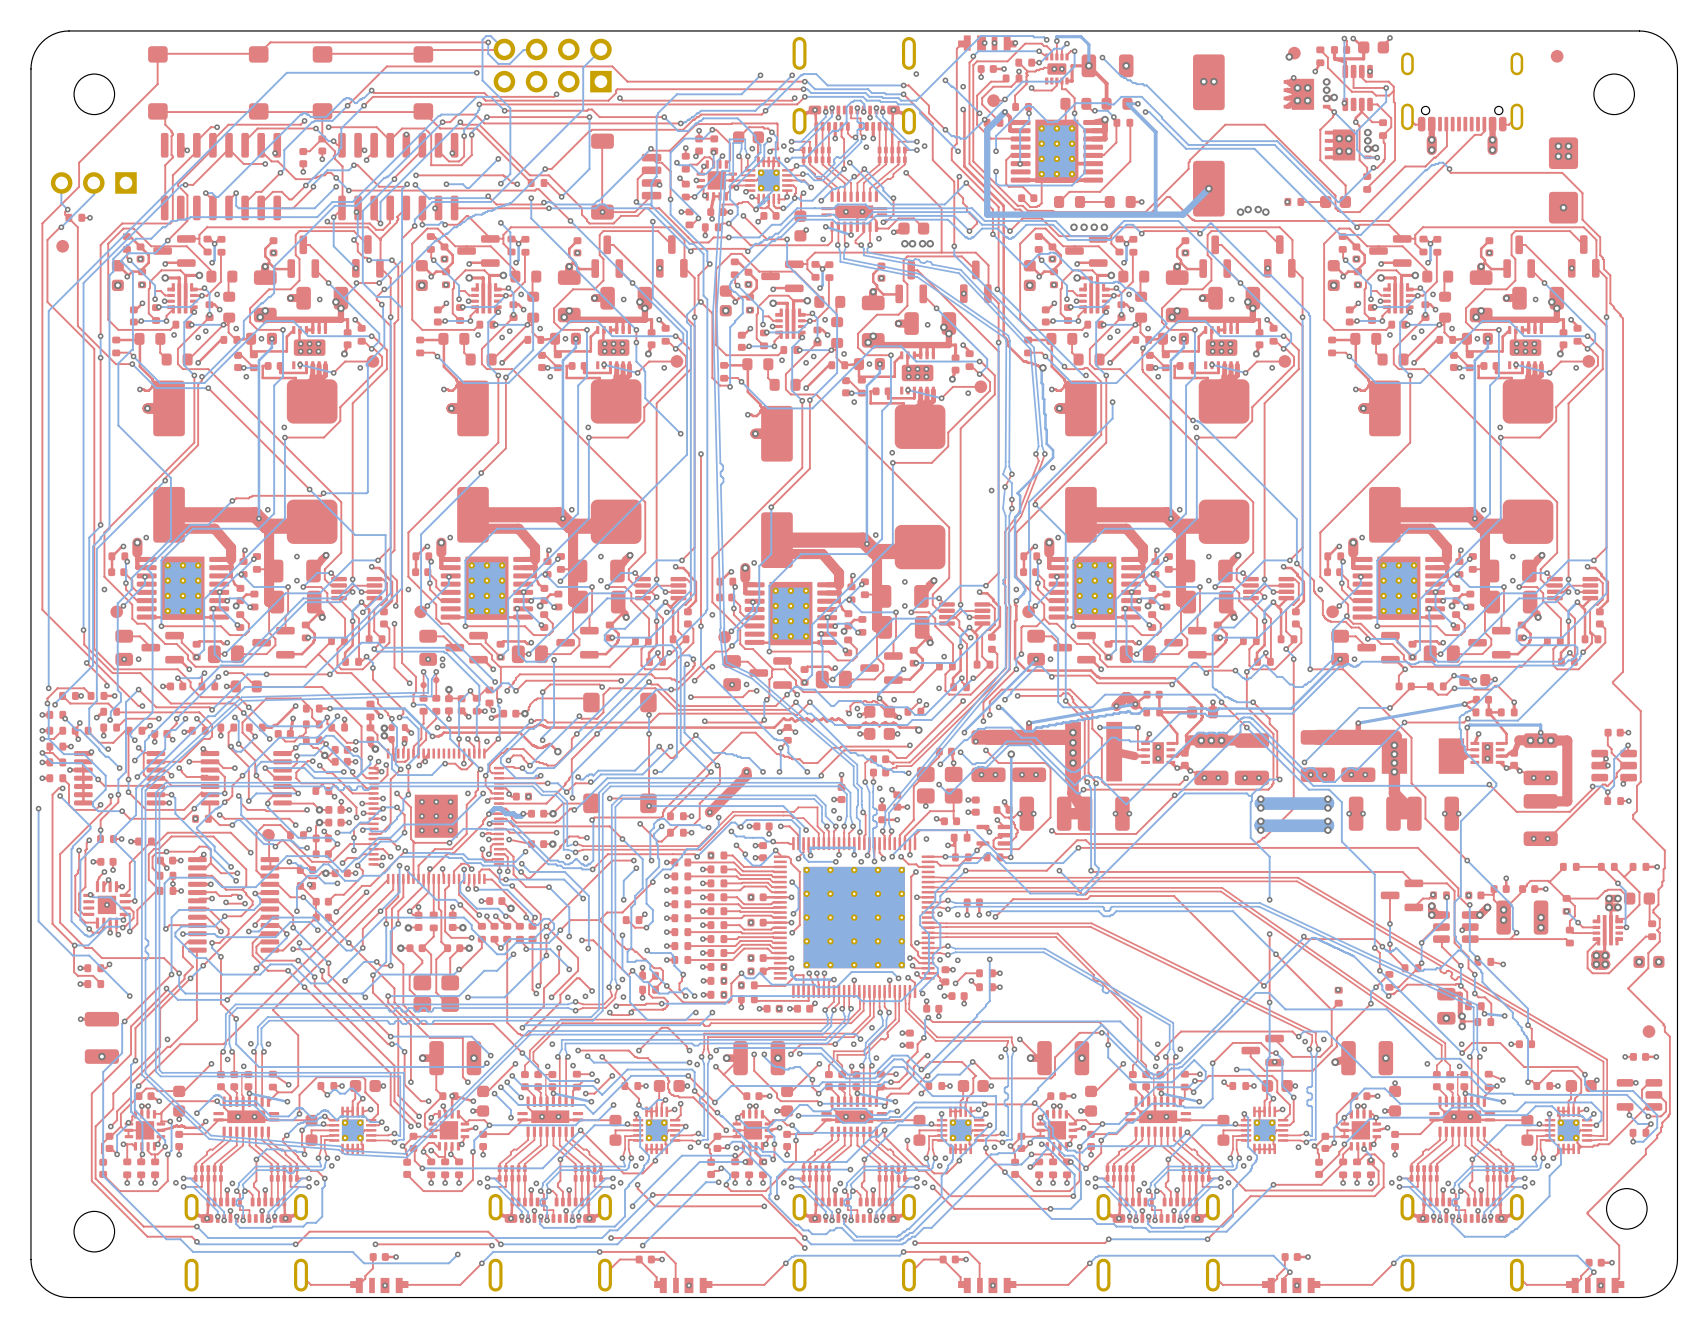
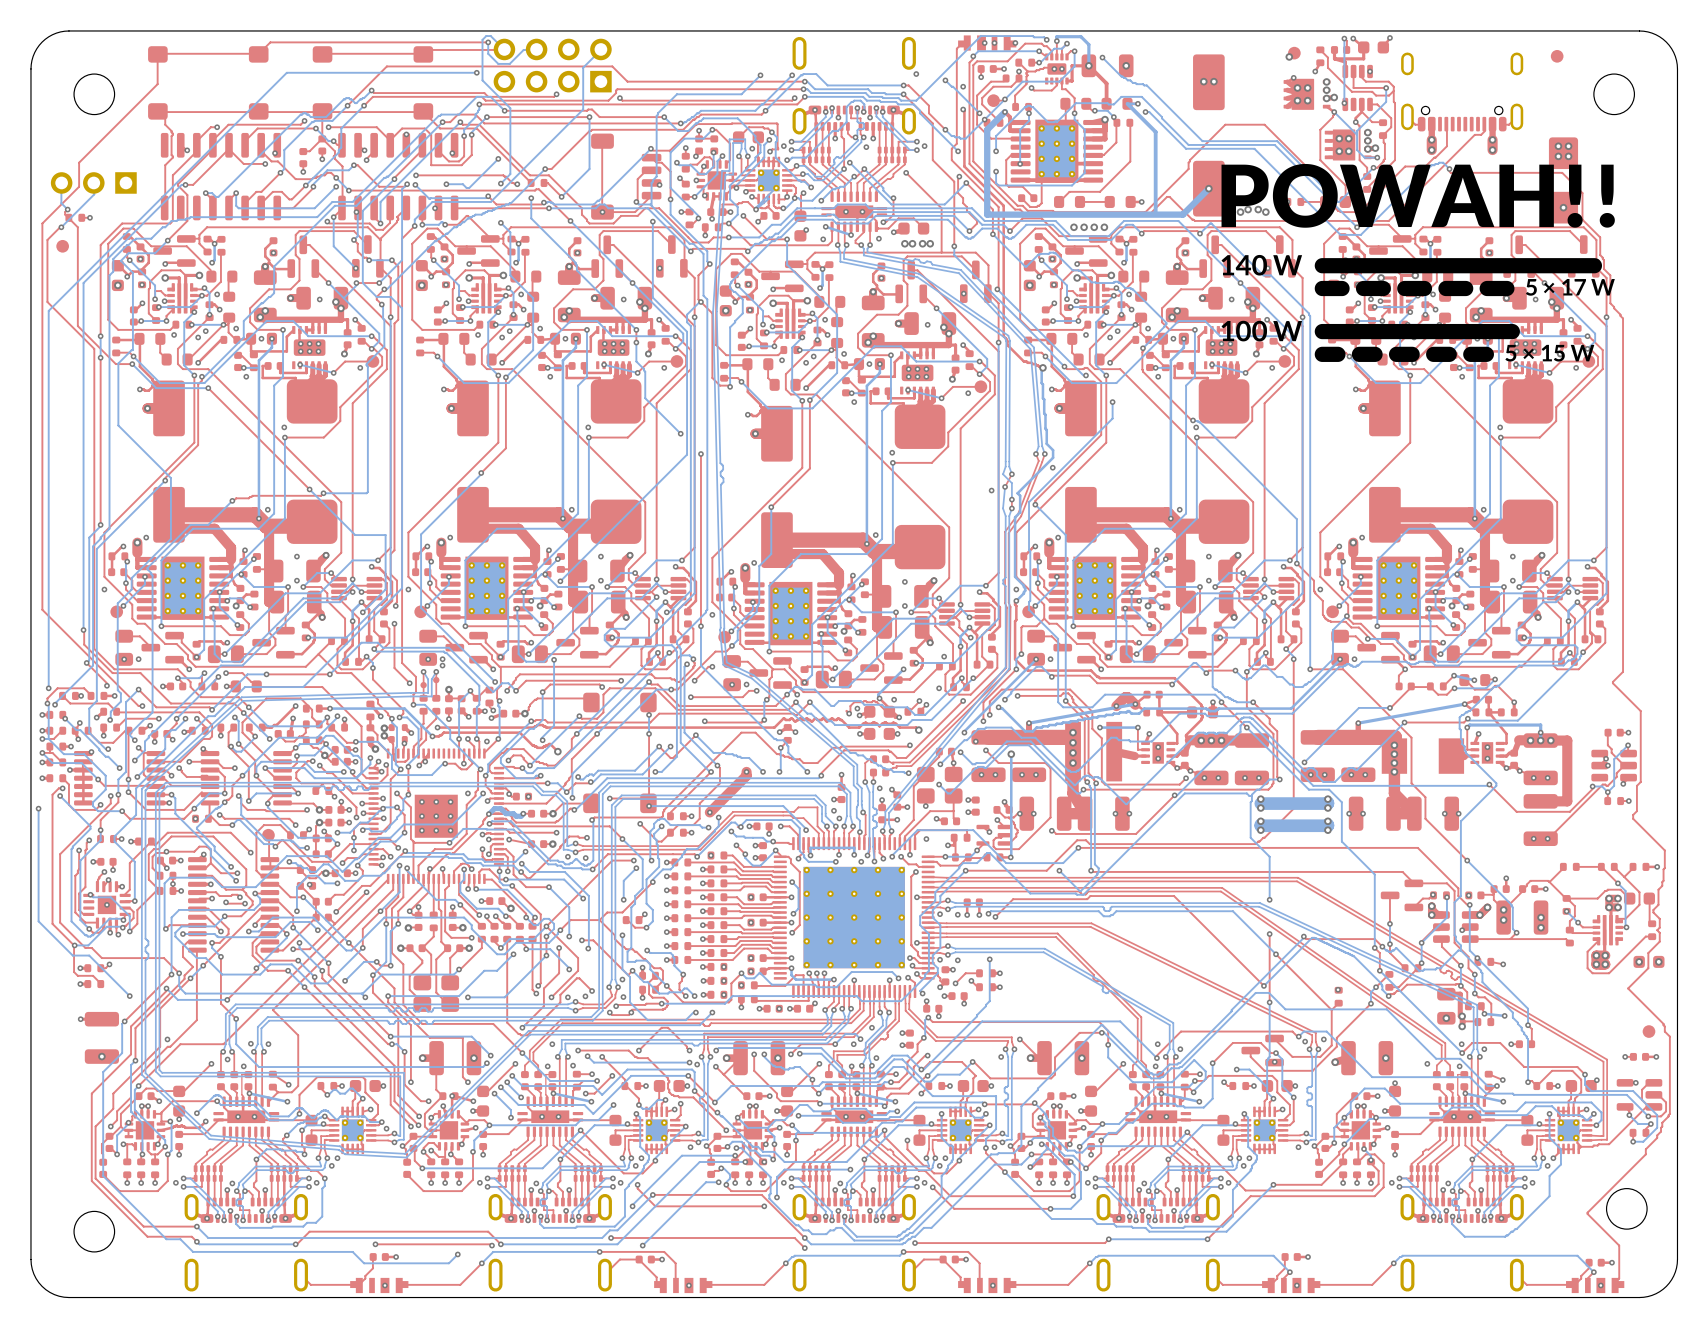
drawing: none -> [1221, 163, 1583, 228]
drawing: none -> [1599, 164, 1615, 228]
drawing: none -> [1221, 254, 1615, 297]
drawing: none -> [1221, 320, 1595, 362]

